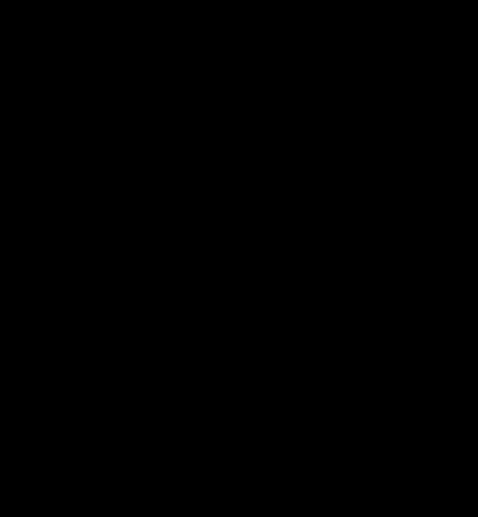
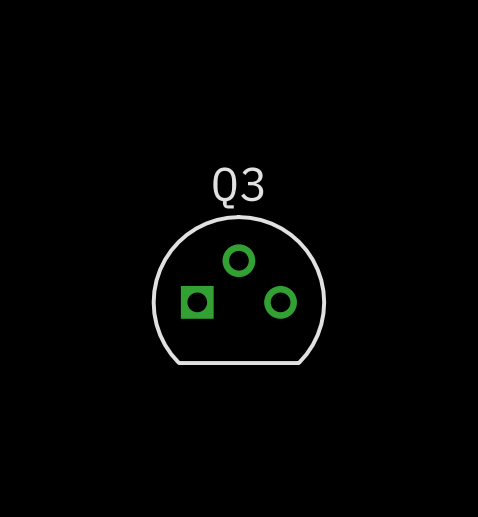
Q3: none -> (238, 290)

